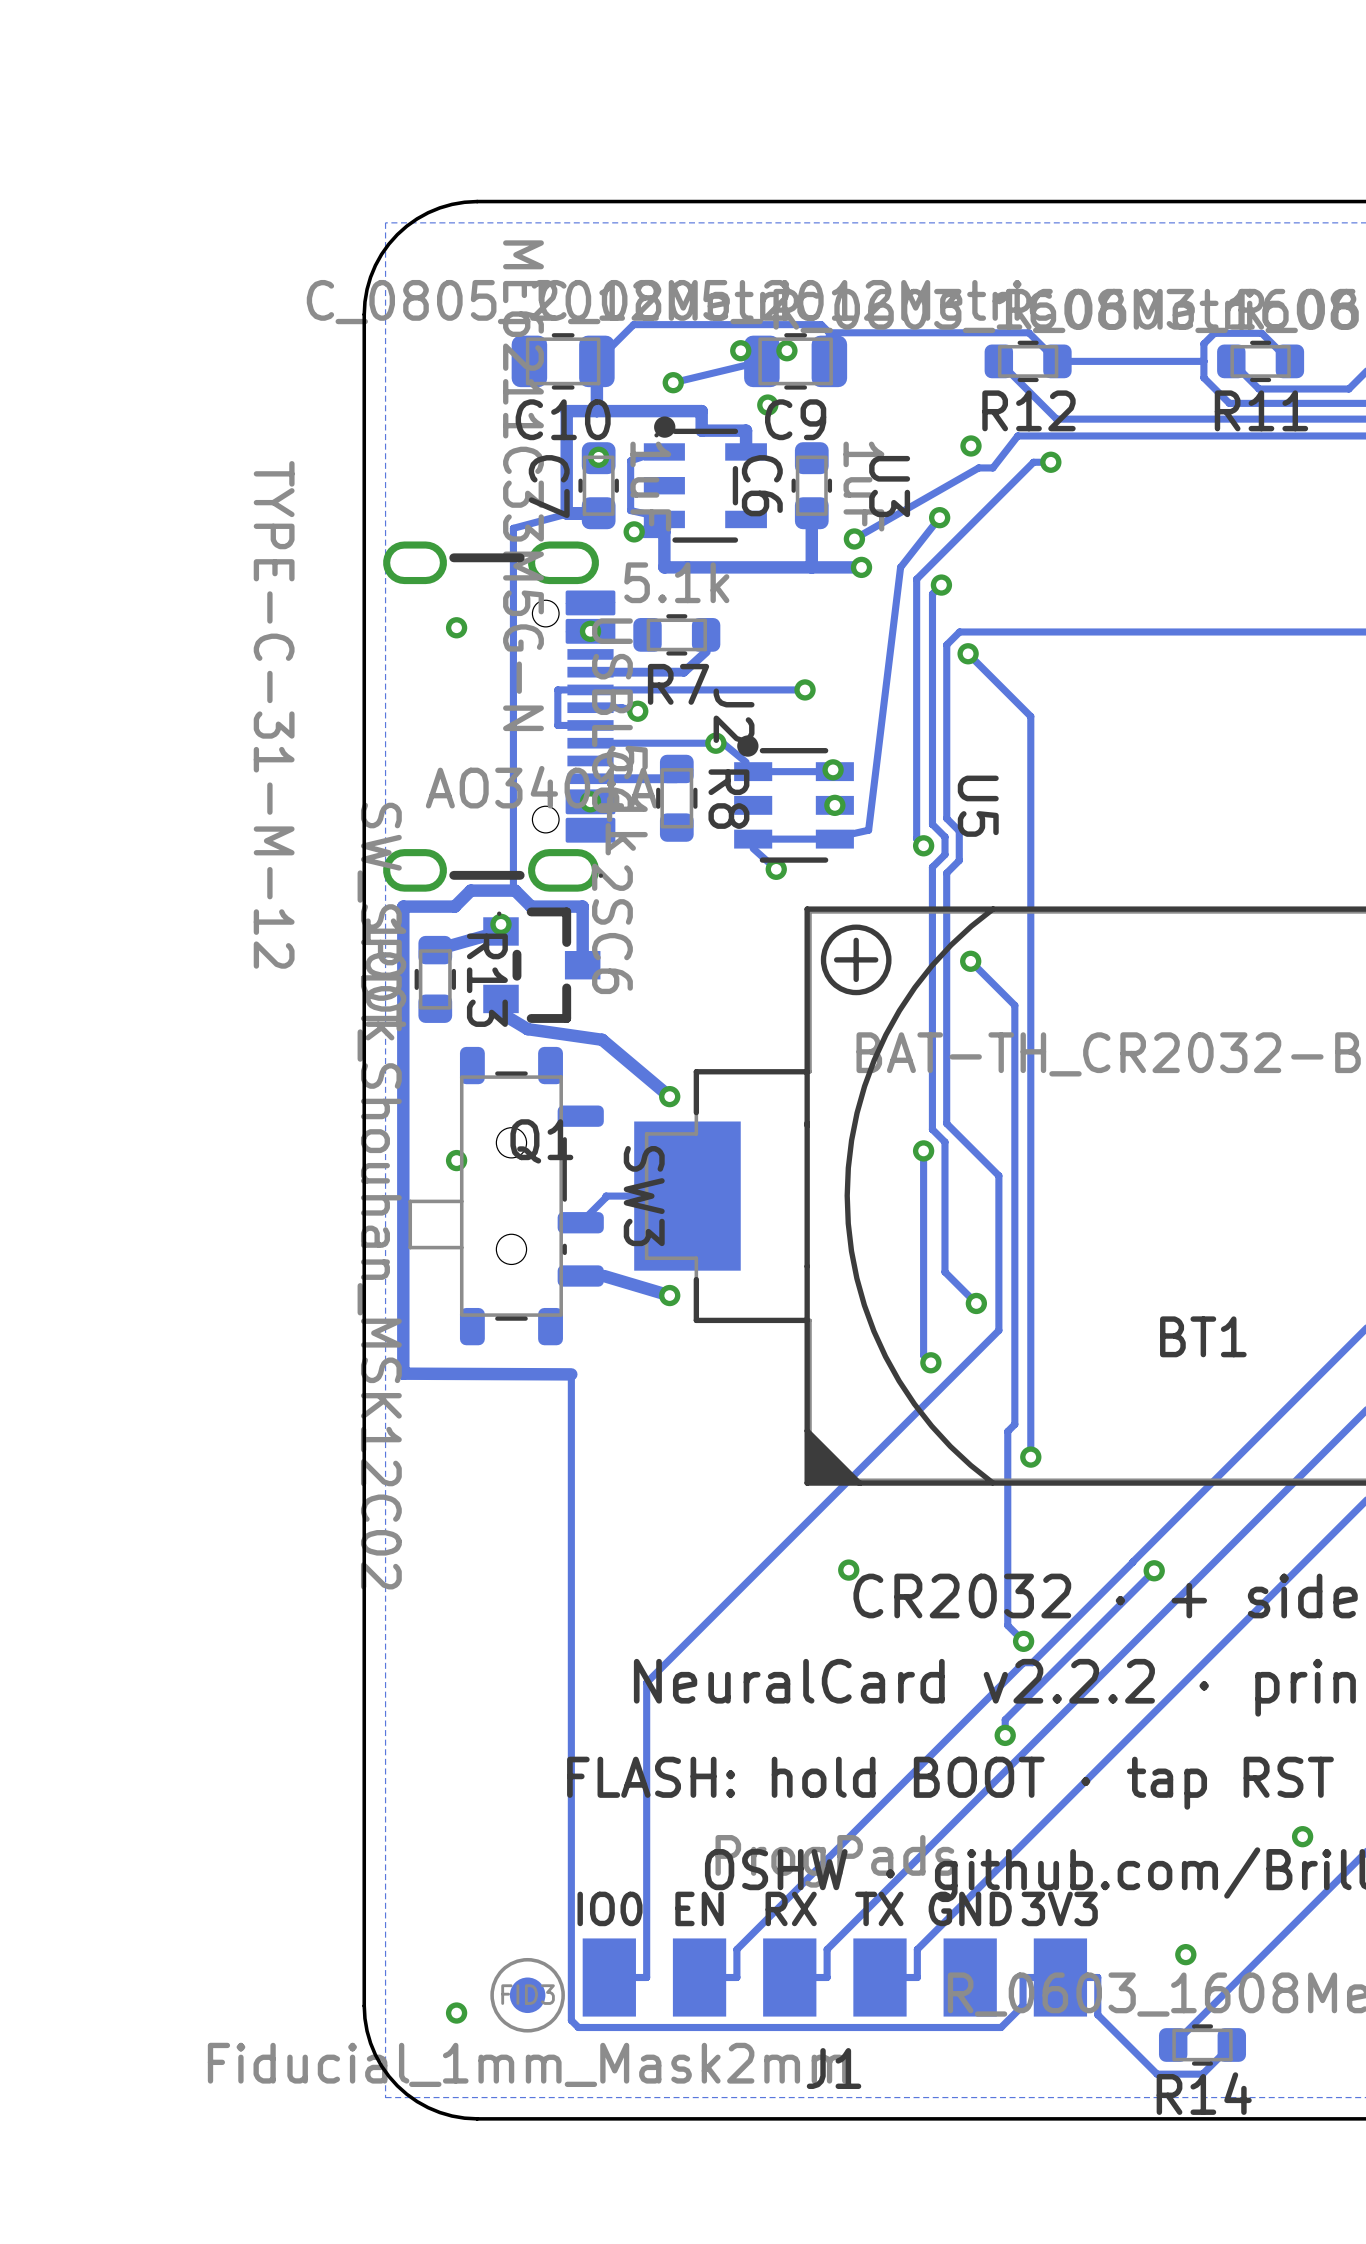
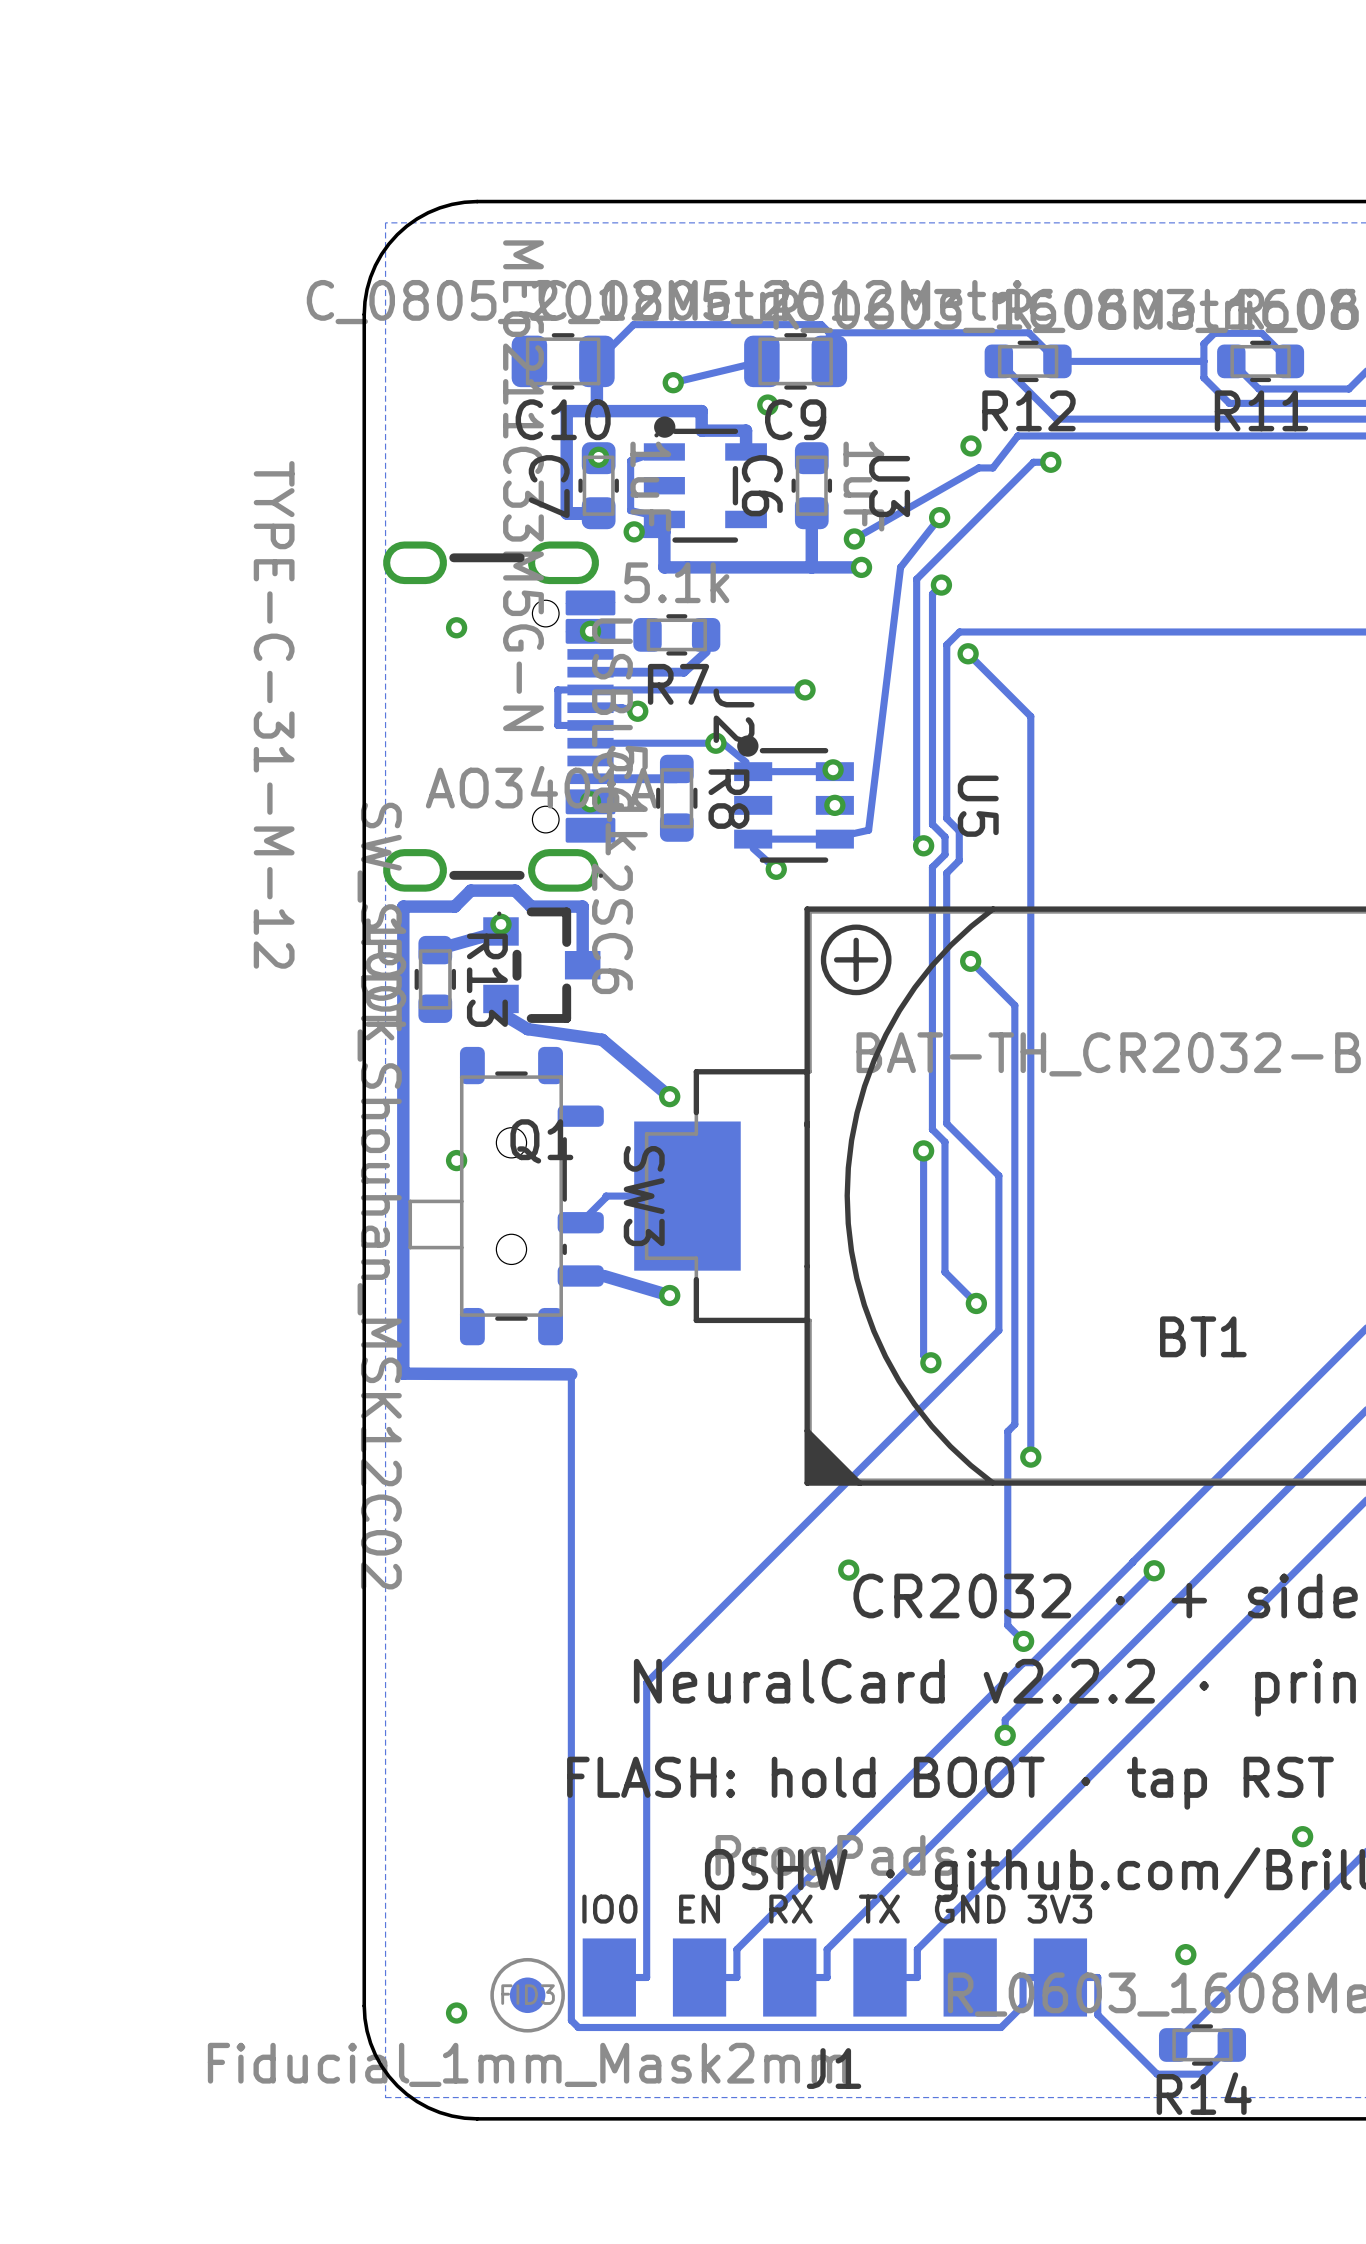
via: (740, 350) -> none
via: (786, 350) -> none
track: (566, 514) (513, 528) (513, 890) (531, 904) -> none
J1 footprint: [582, 1938, 1088, 2017] -> [582, 1938, 1088, 2017]

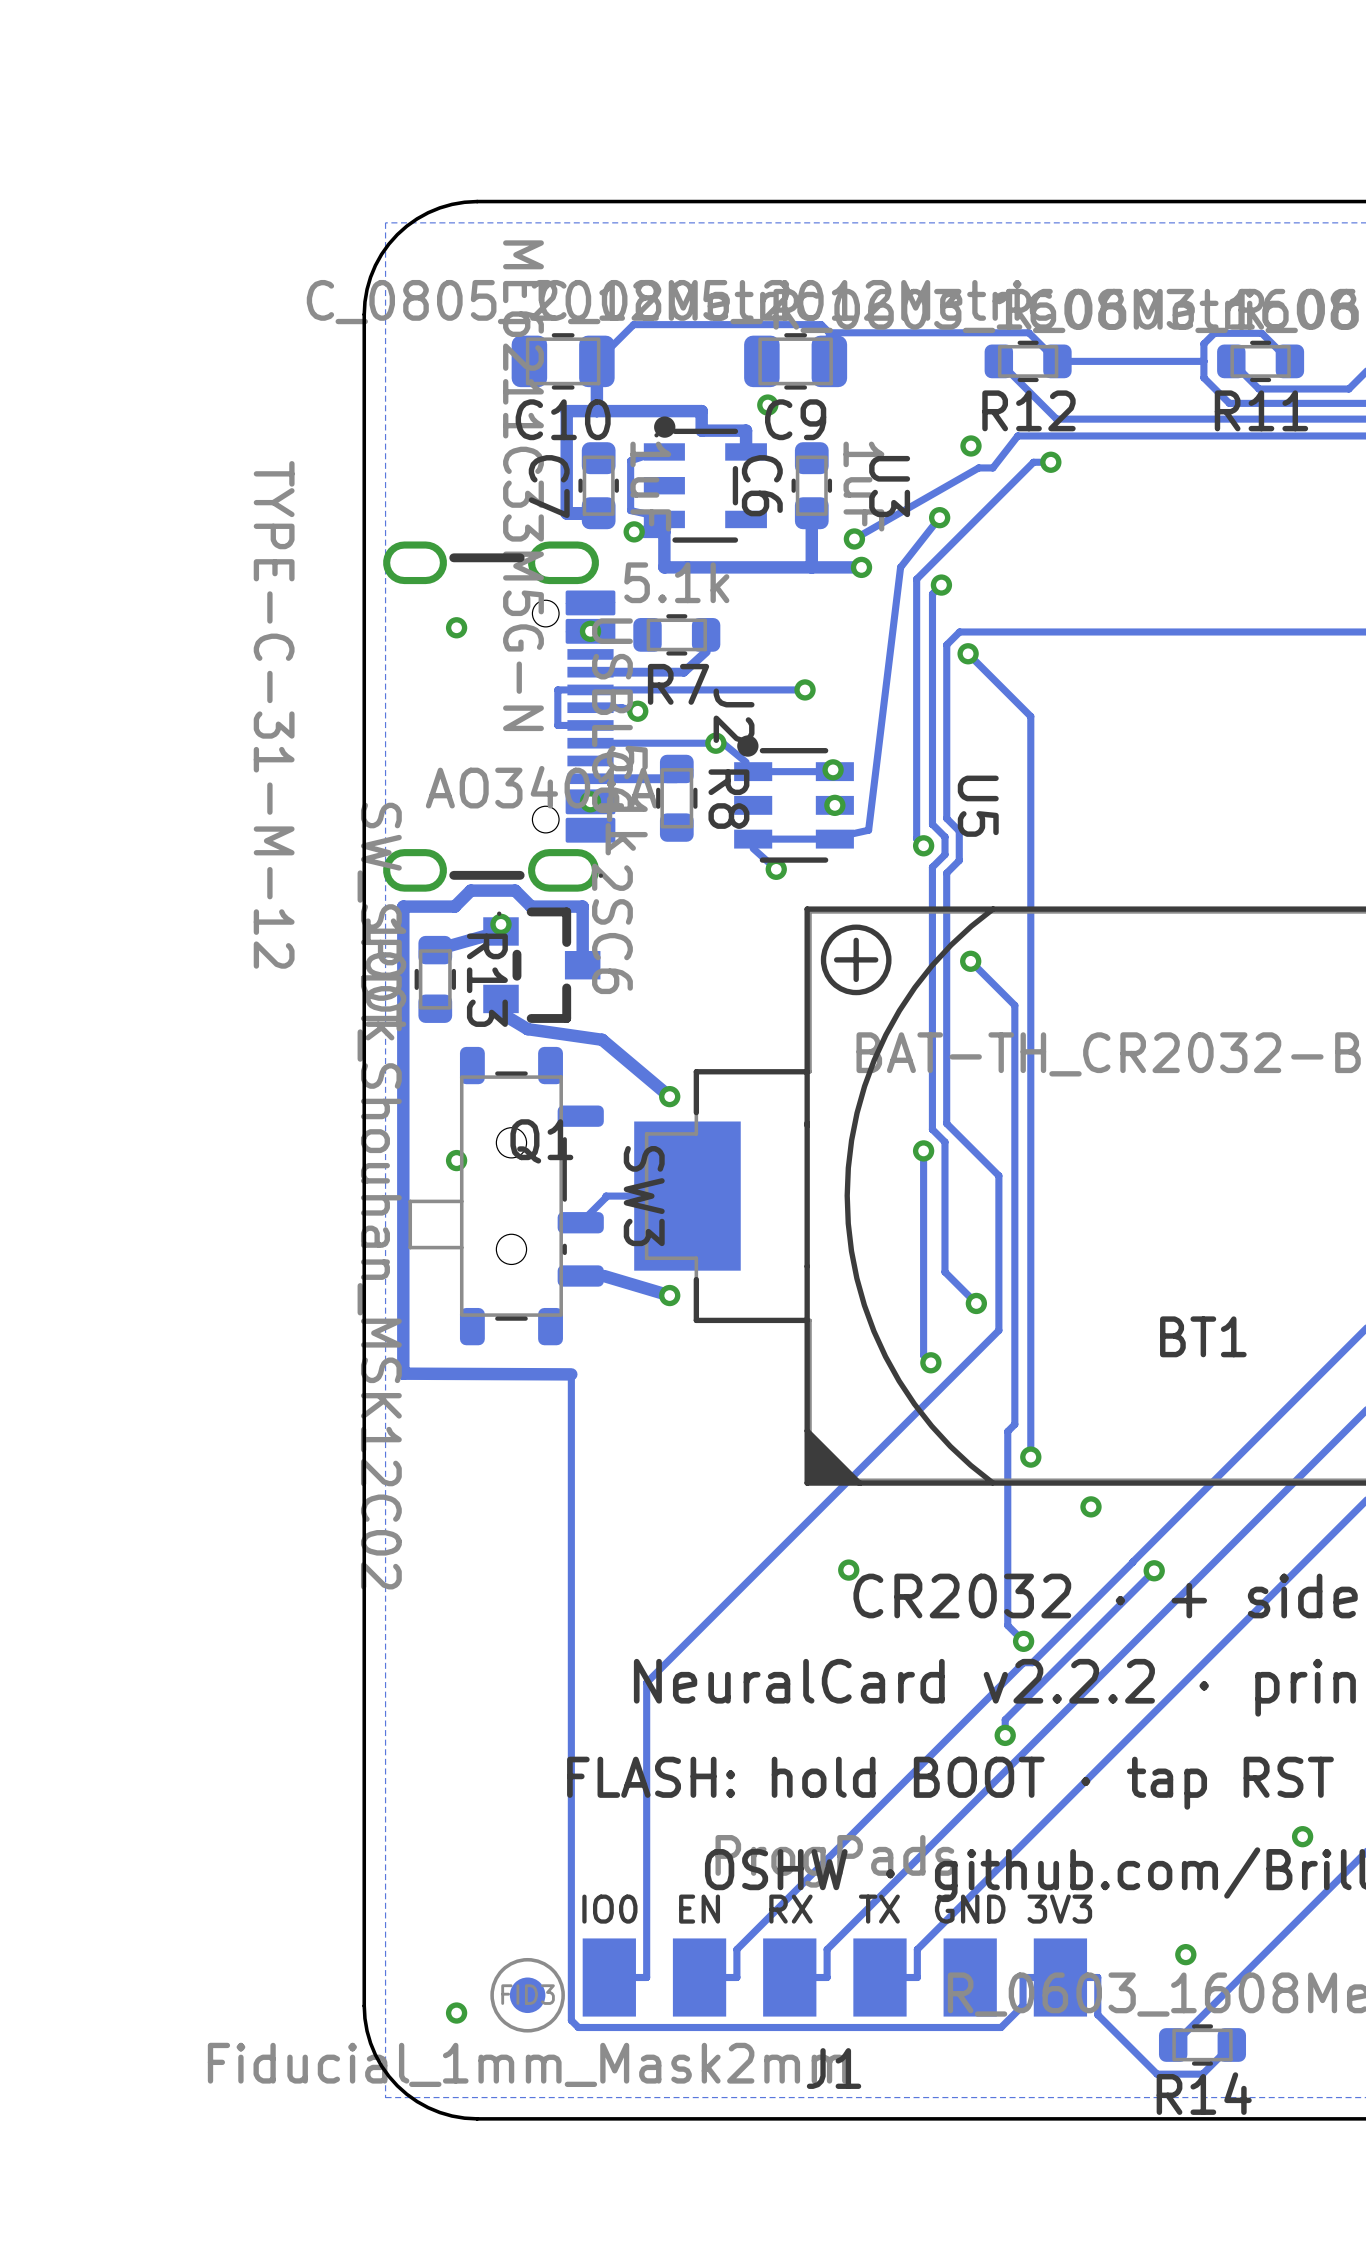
track: (762, 361) (673, 382) -> none
via: (673, 382) -> none
via: (598, 457) -> none
via: none -> (1090, 1506)

